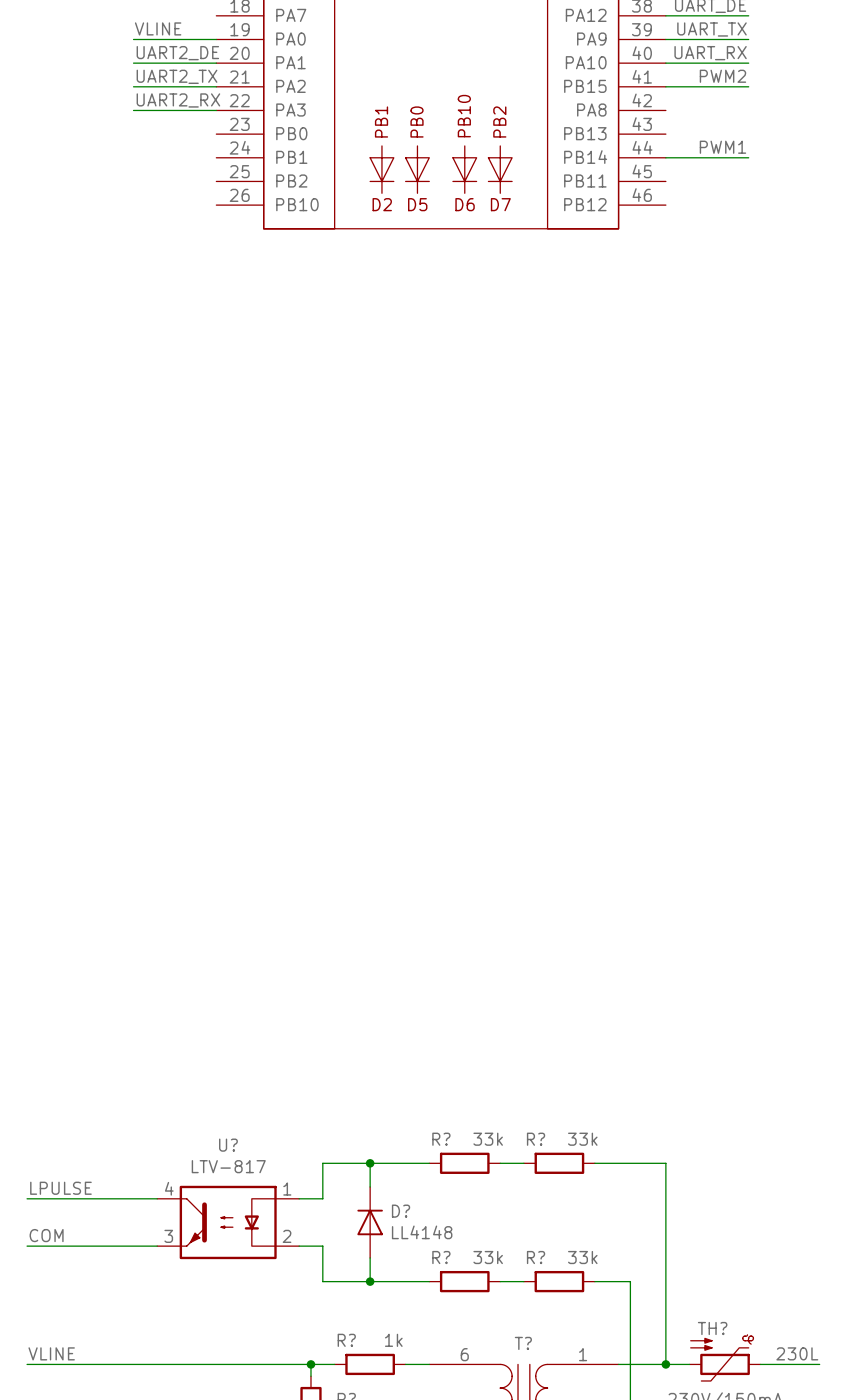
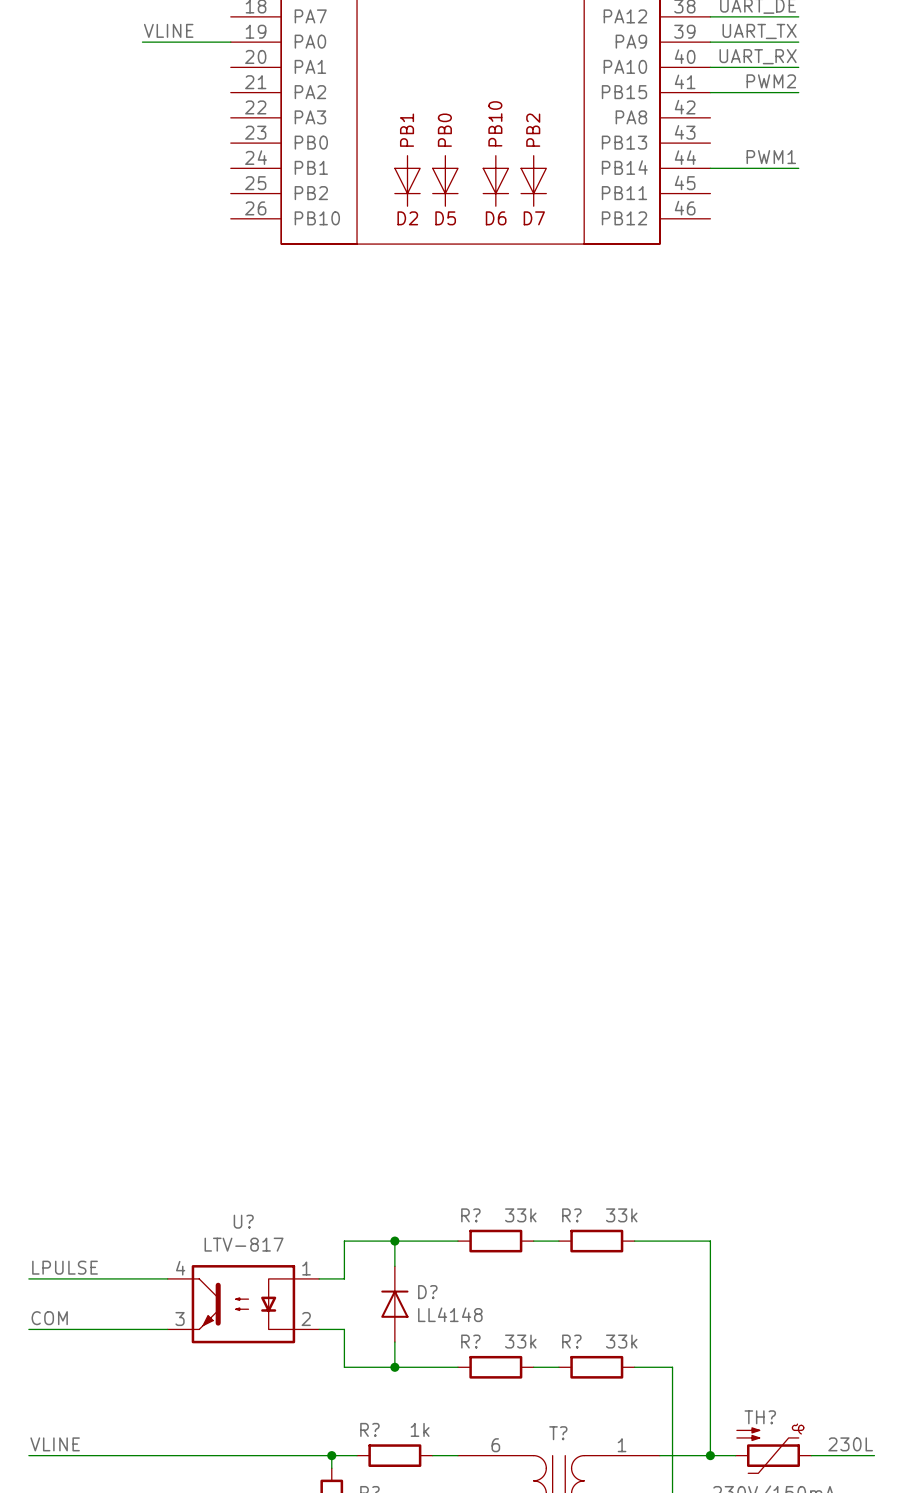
label: UART2_DE (177, 53) -> none
wire: (133, 63) (216, 63) -> none
label: UART2_TX (177, 76) -> none
wire: (133, 86) (216, 86) -> none
label: UART2_RX (178, 100) -> none
wire: (133, 110) (216, 110) -> none

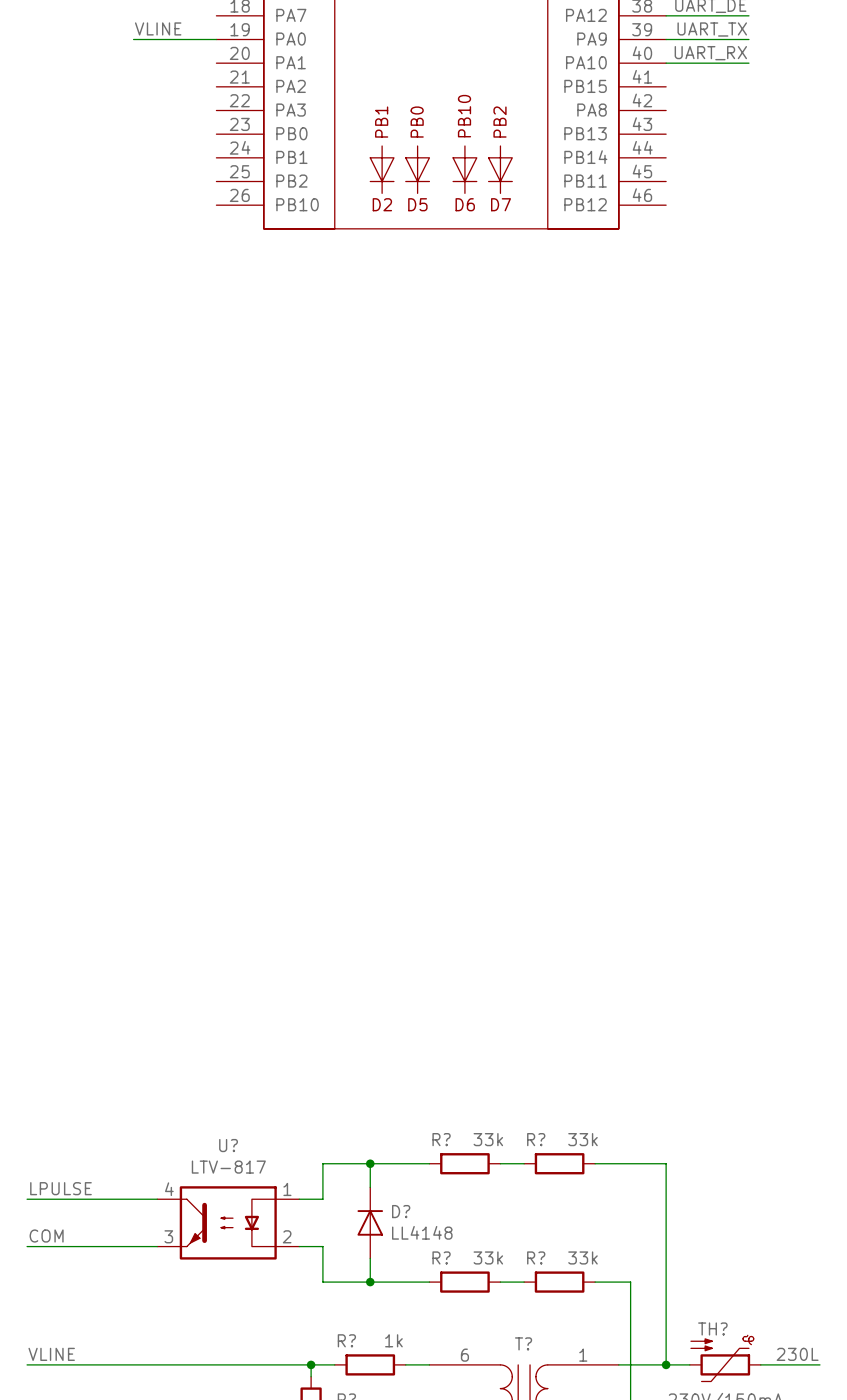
label: PWM2 (771, 81) -> none
wire: (710, 92) (798, 92) -> none
label: PWM1 (771, 157) -> none
wire: (710, 168) (798, 168) -> none

